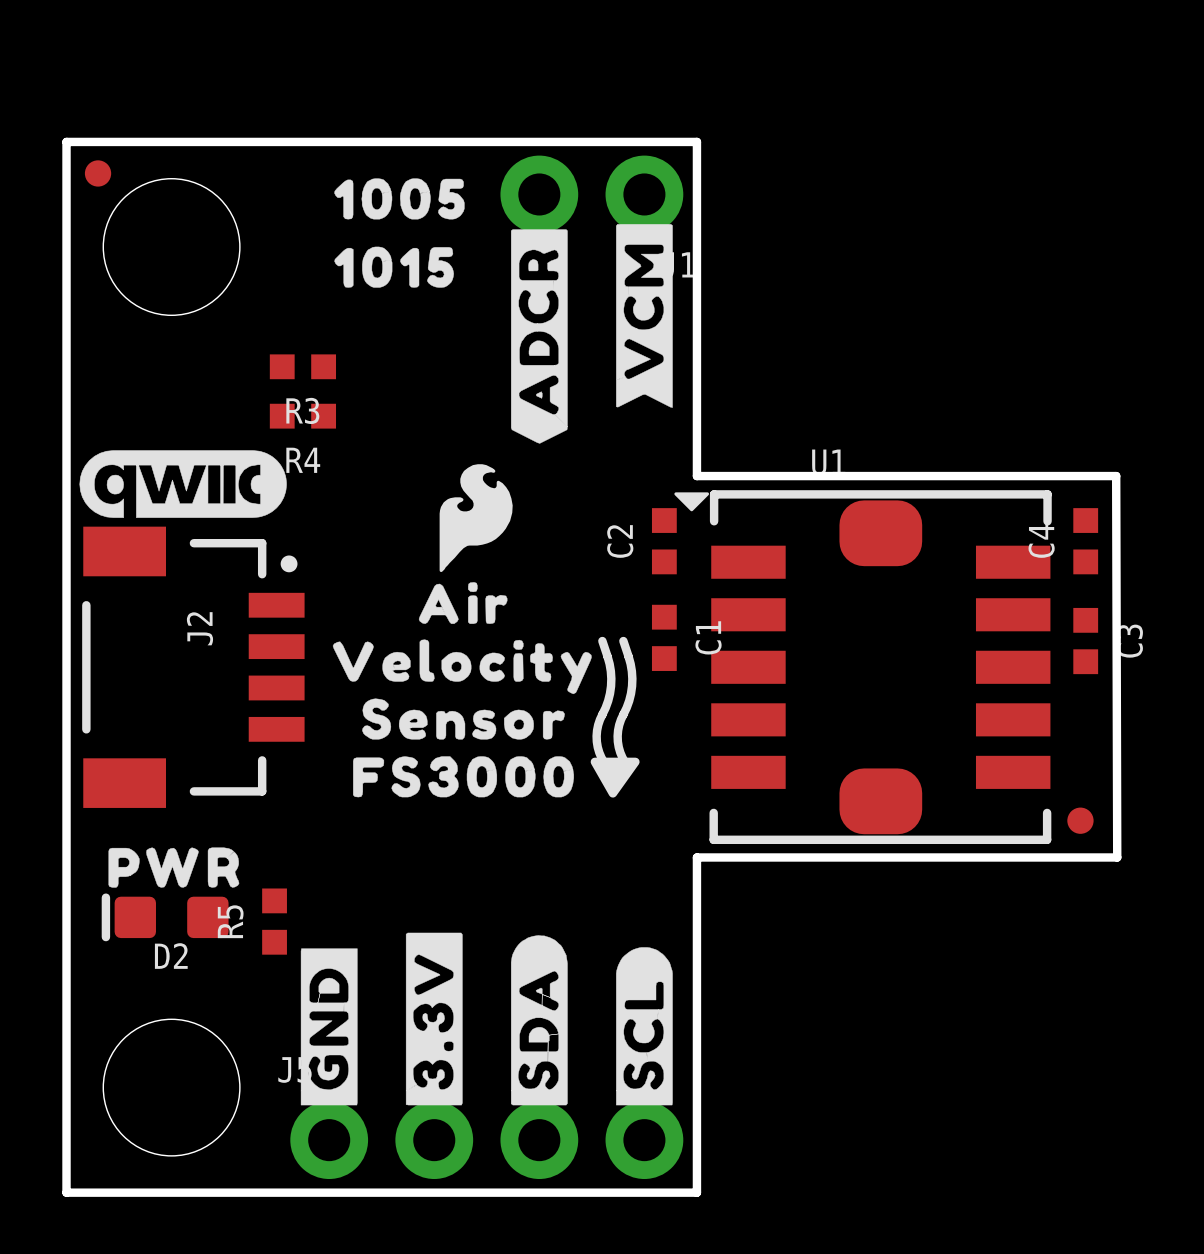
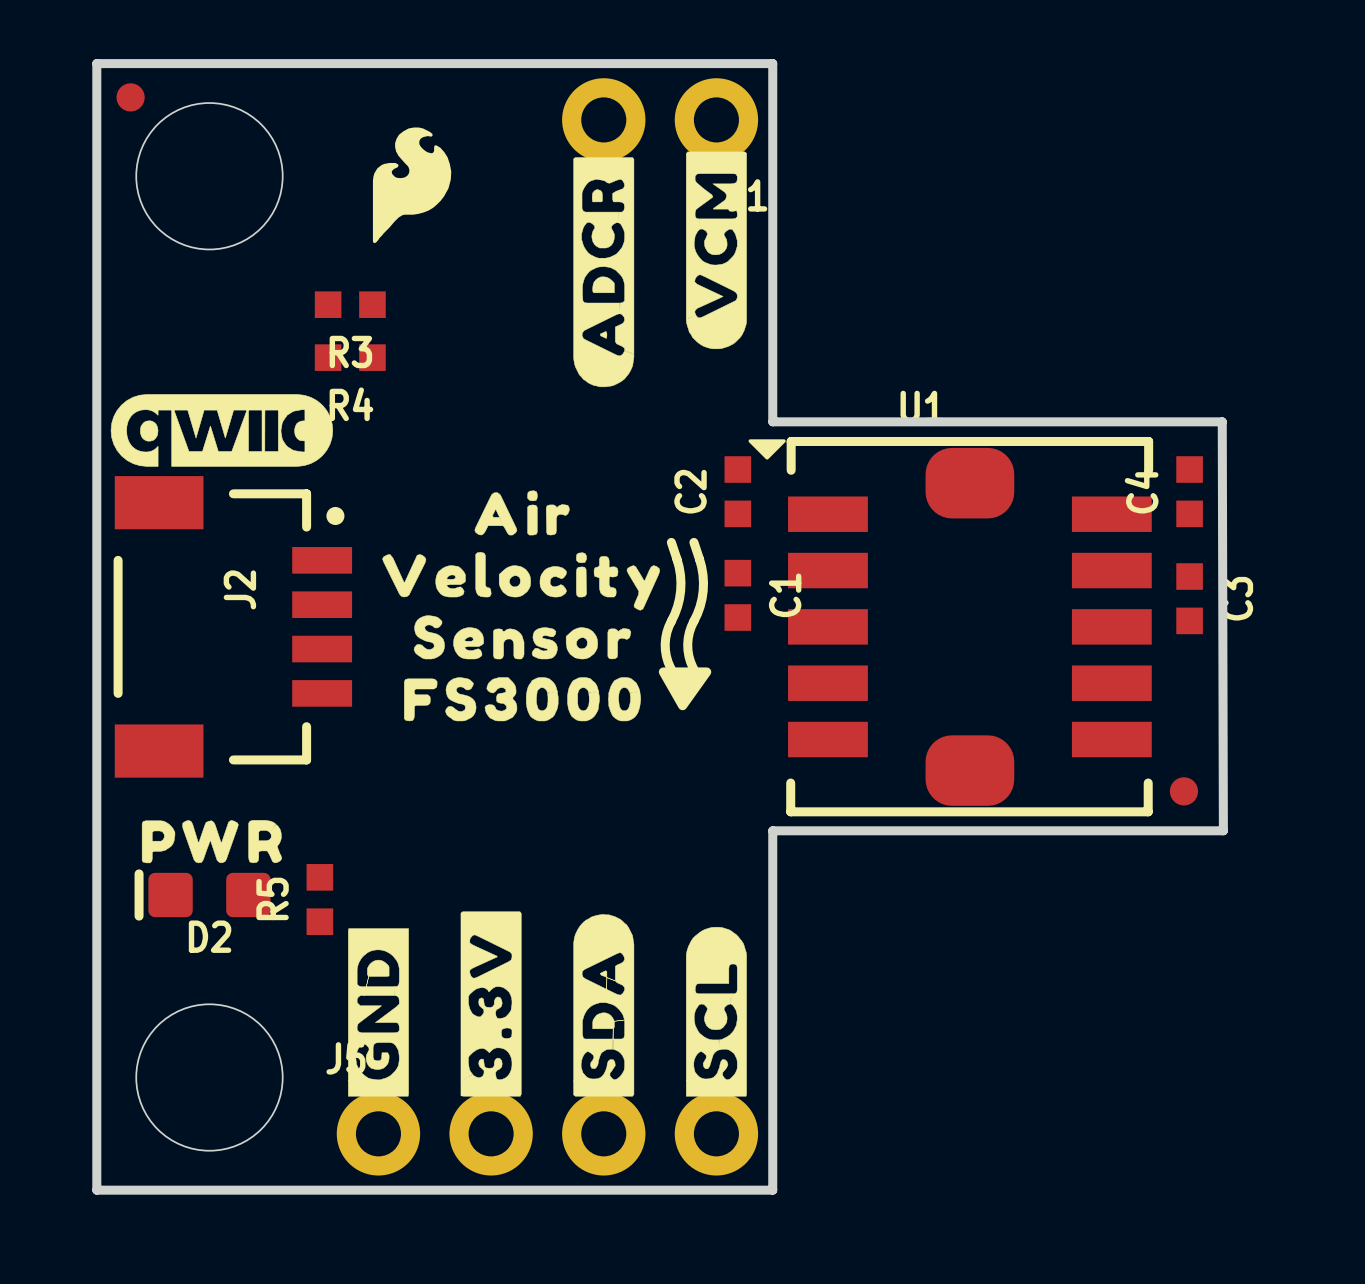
drawing: [334, 178, 465, 288] -> none
drawing shape: [616, 224, 673, 408] -> [686, 151, 747, 350]
drawing shape: [511, 229, 568, 444] -> [573, 157, 635, 388]
drawing position: (476, 518) -> (412, 185)
drawing position: (463, 603) -> (522, 512)
line: (602, 641) (609, 663) (611, 686) (608, 700) (598, 724) (596, 741) (601, 757) (607, 767) -> (671, 542) (679, 566) (680, 590) (677, 606) (666, 632) (665, 650) (670, 667) (676, 677)
line: (623, 641) (630, 663) (632, 686) (629, 700) (619, 724) (617, 741) (622, 757) (628, 767) -> (693, 542) (701, 566) (703, 590) (700, 606) (689, 632) (687, 650) (692, 667) (699, 677)
drawing position: (462, 666) -> (521, 581)
drawing position: (463, 719) -> (522, 637)
drawing position: (463, 776) -> (522, 699)
drawing position: (615, 777) -> (685, 688)

